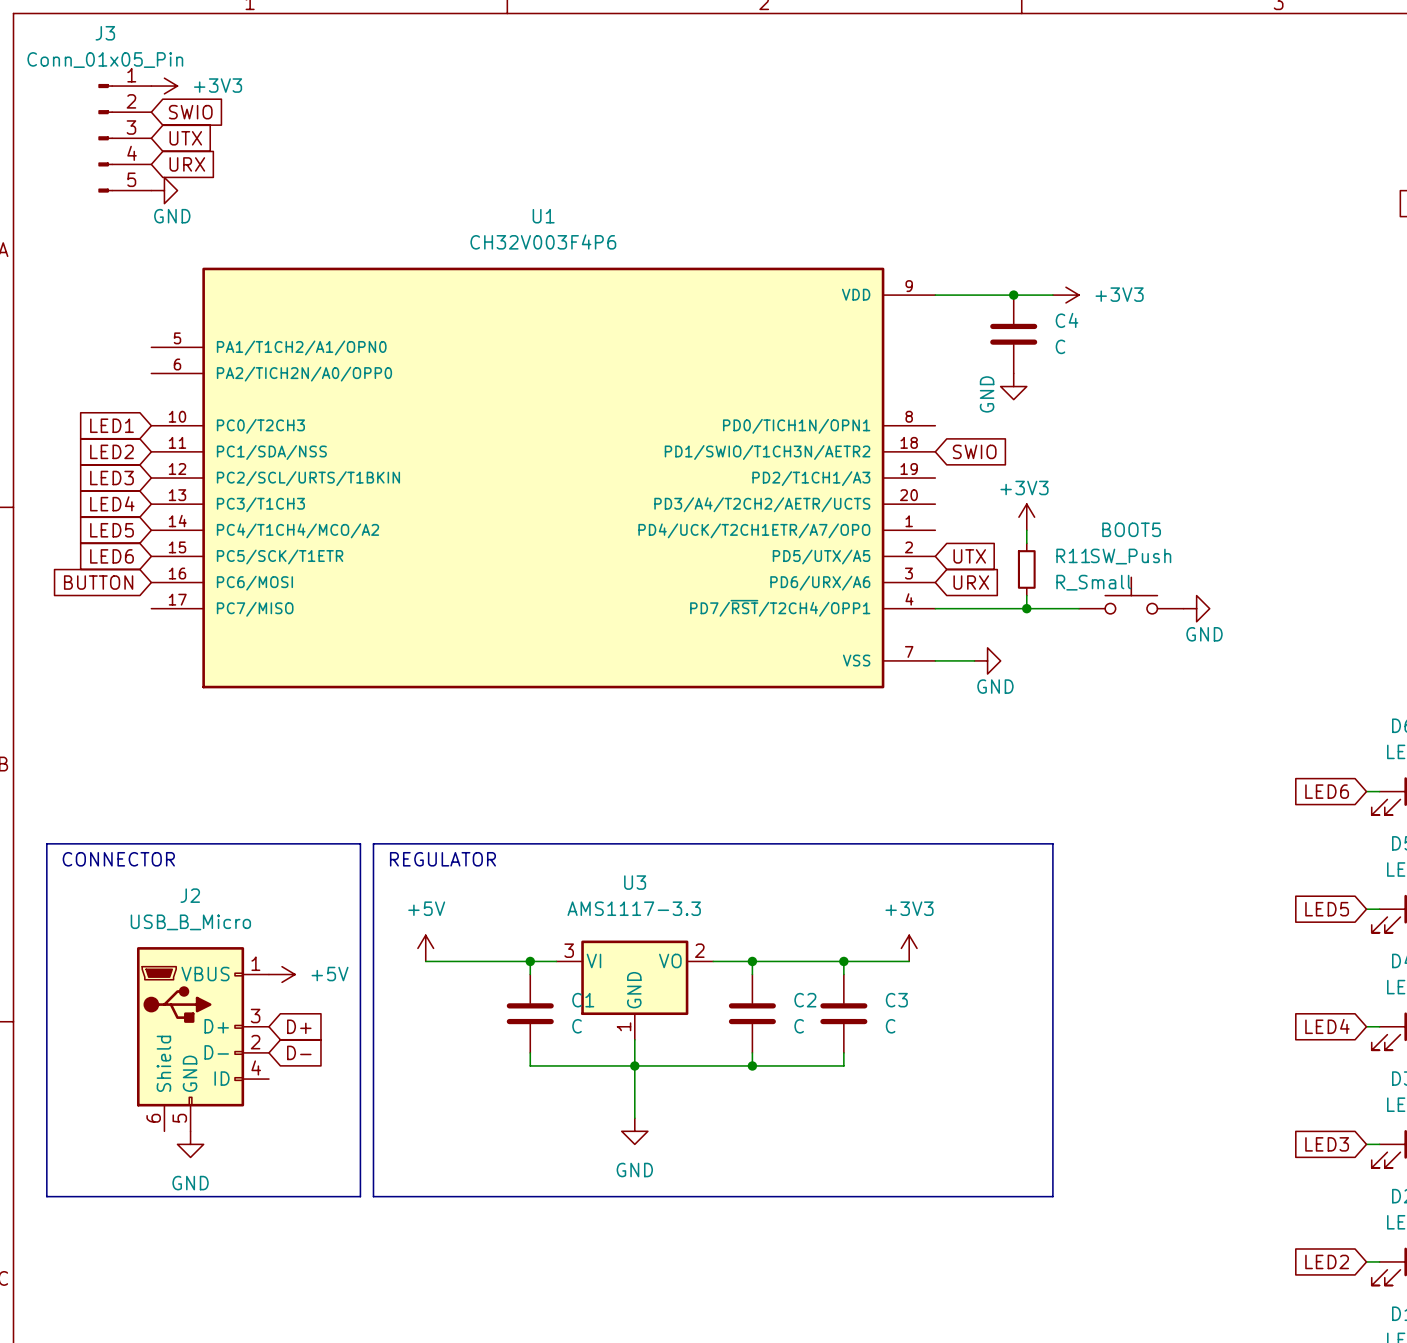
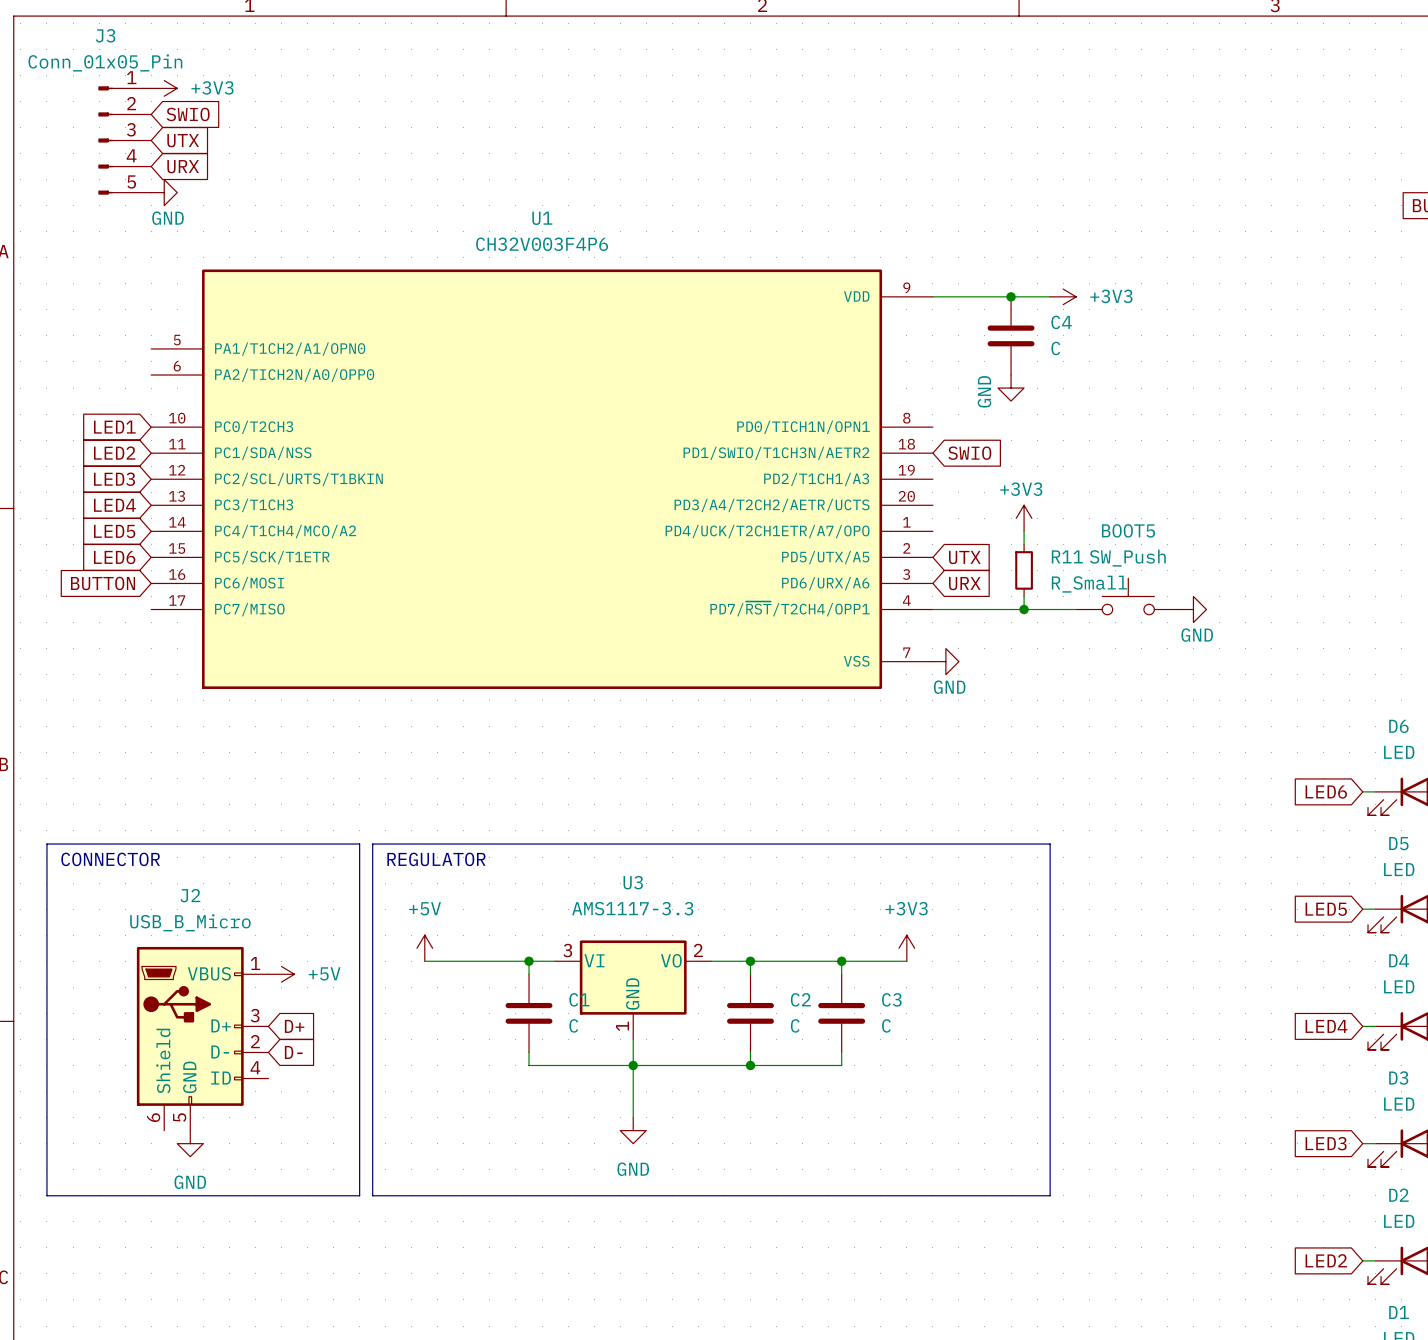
wire: (935, 660) (974, 660) -> none
power symbol position: GND (987, 660) -> GND (945, 661)

